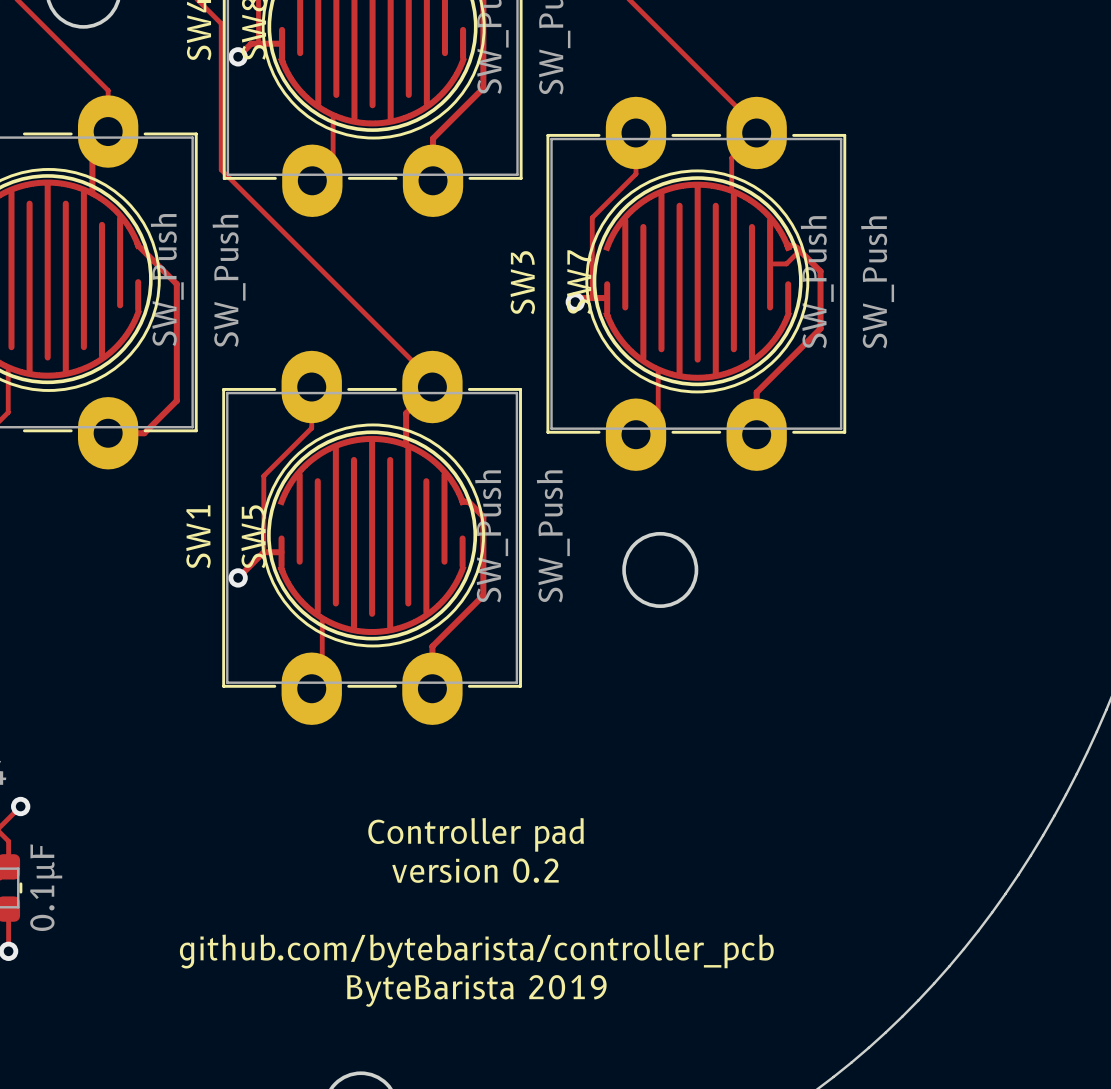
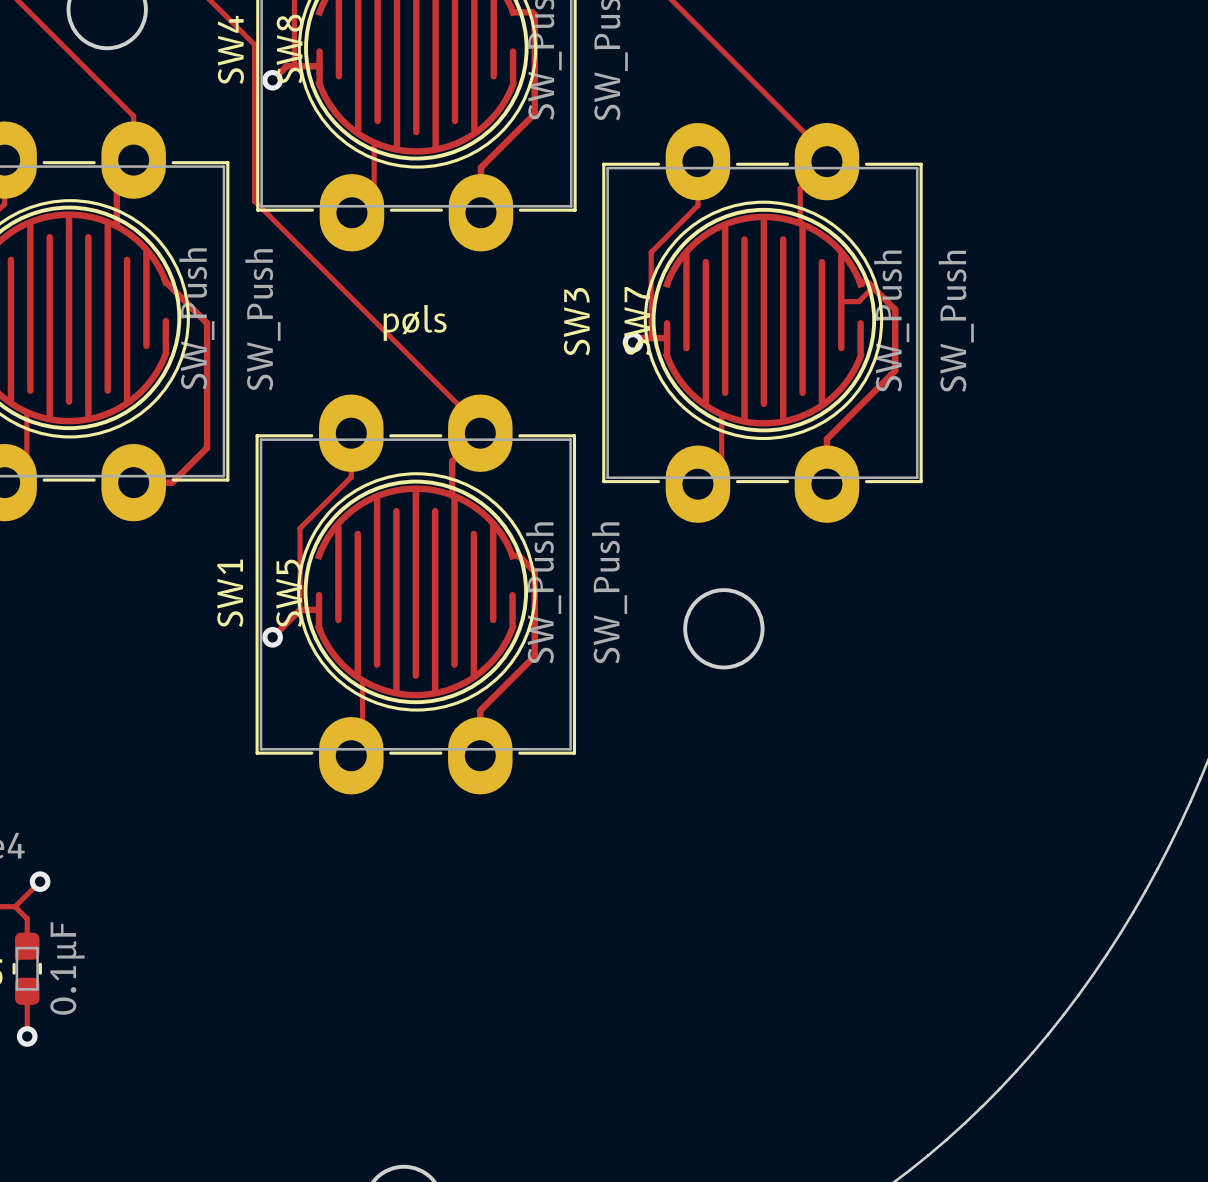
text: none -> pøls (415, 322)
text: Controller pad (476, 834) -> none
text: version 0.2 (475, 870) -> none
text: github.com/bytebarista/controller_pcb (476, 951) -> none
text: ByteBarista 2019 (476, 990) -> none

